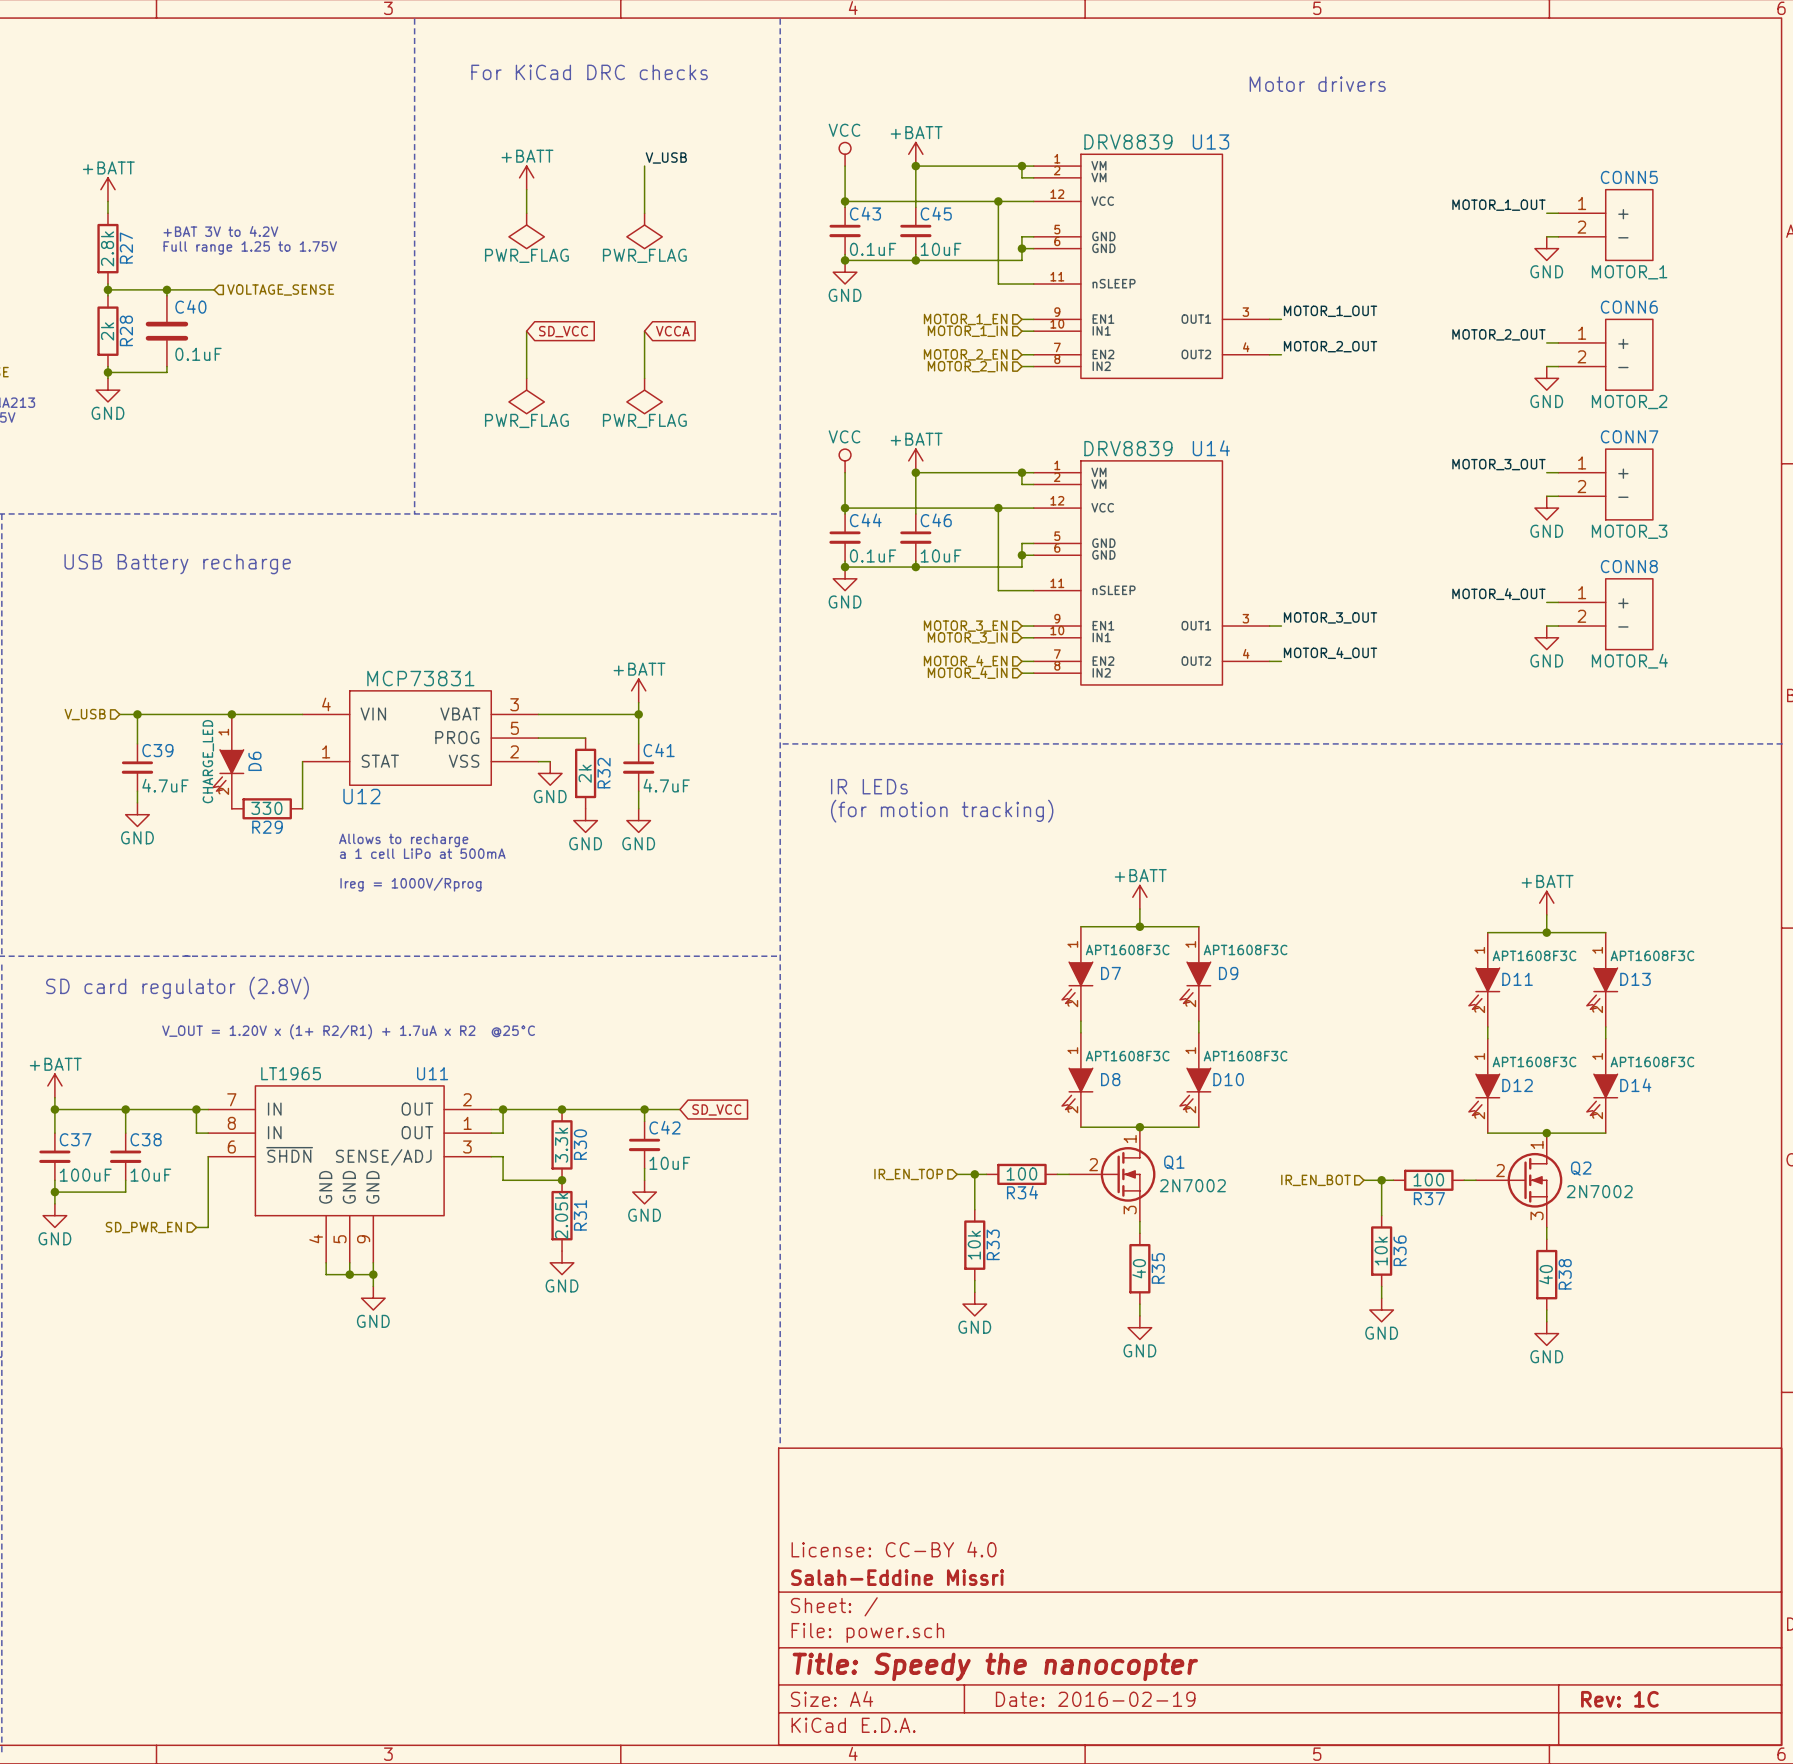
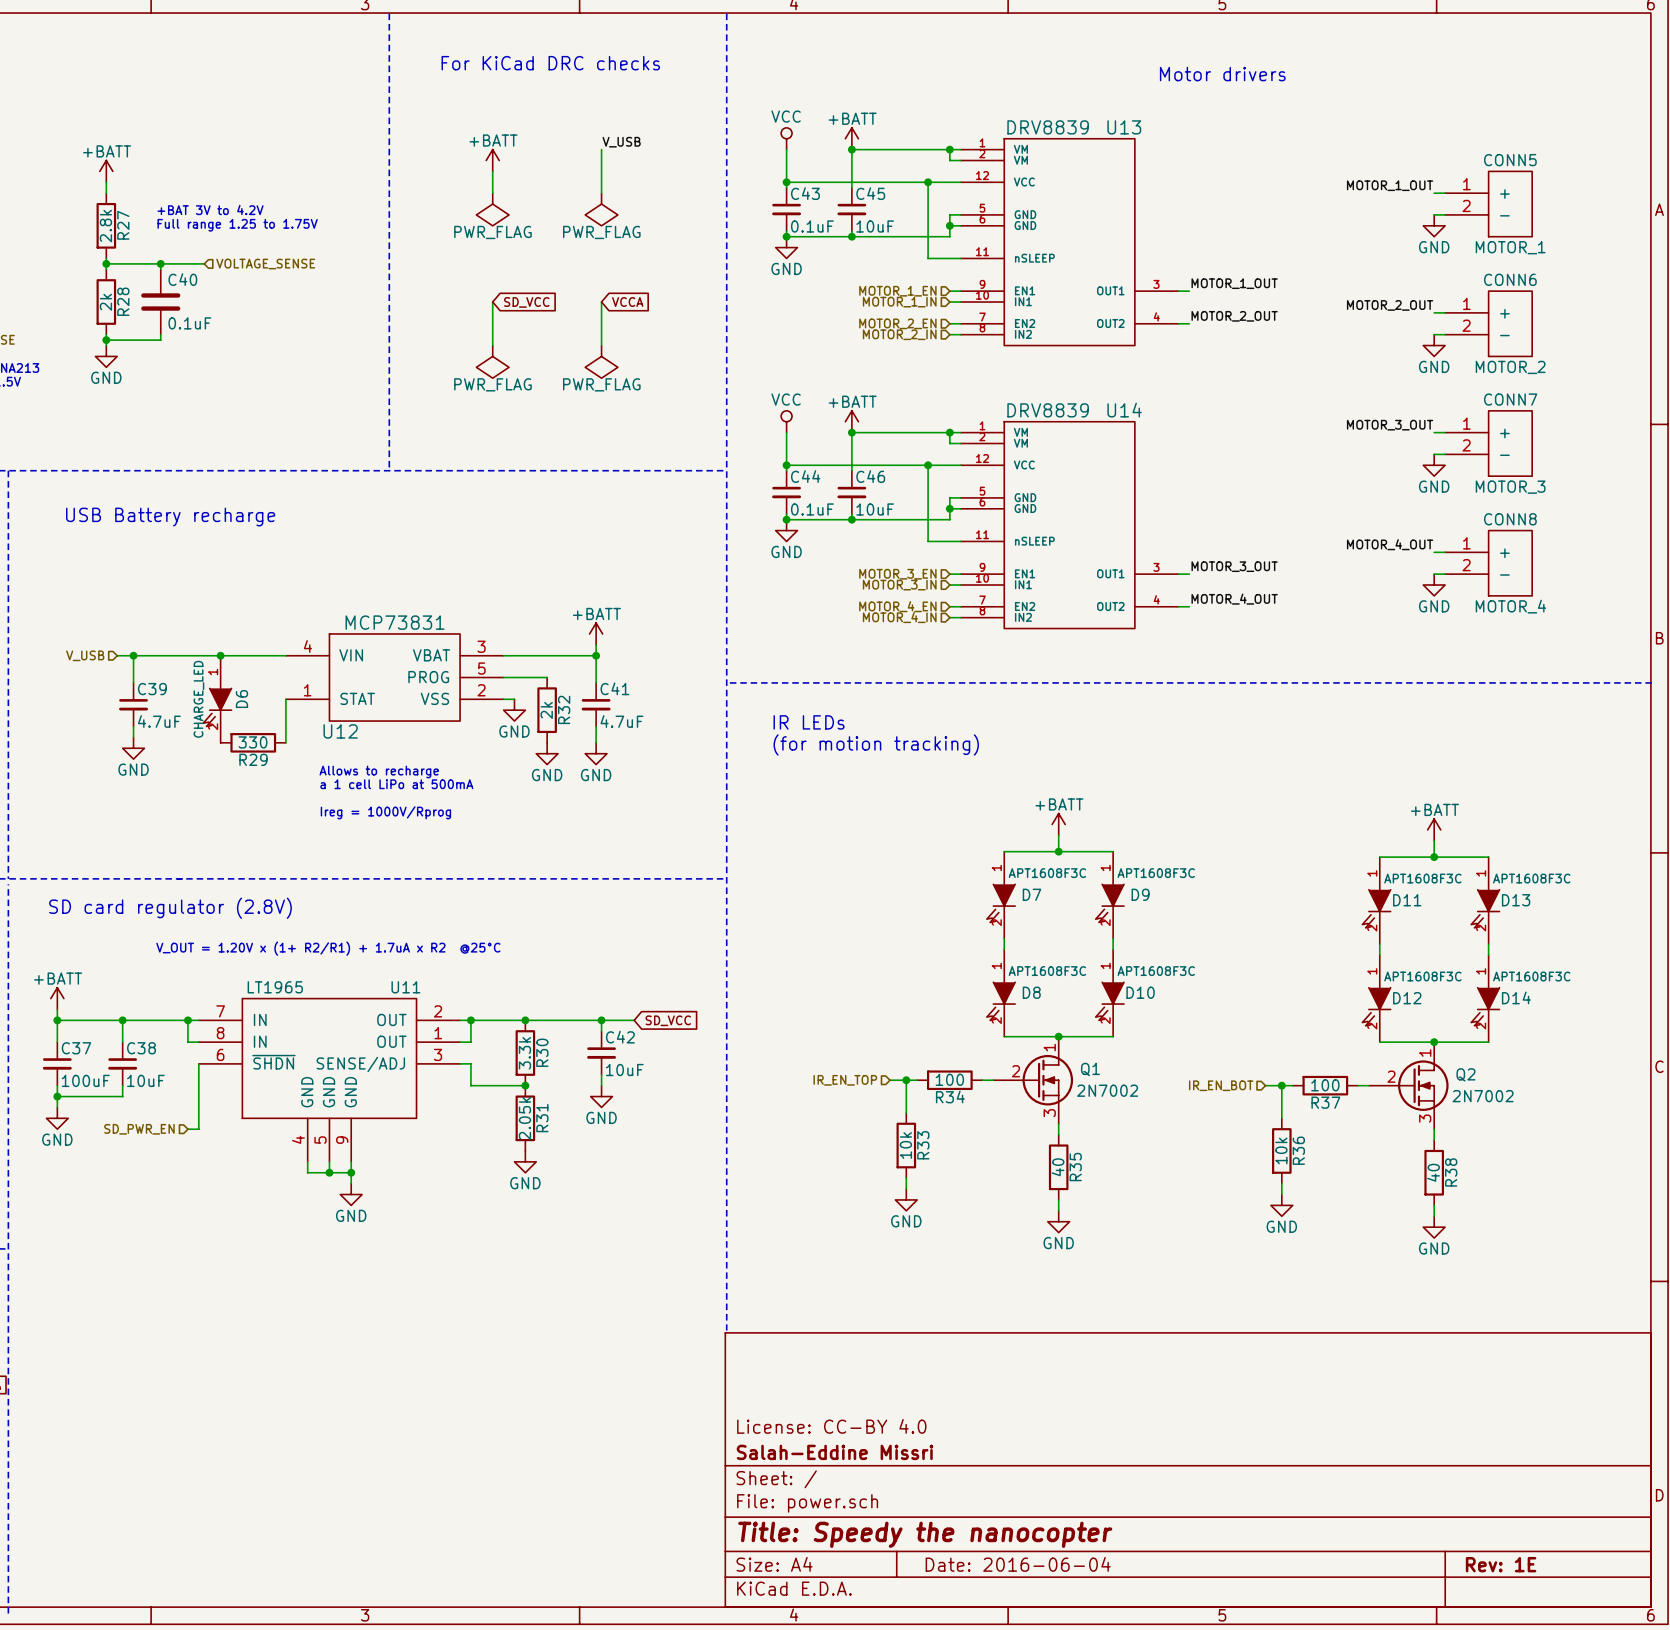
title block: Date: 2016-02-19 (1095, 1699) -> Date: 2016-06-04 (1018, 1564)
title block: Rev: 1C (1619, 1699) -> Rev: 1E (1501, 1564)

